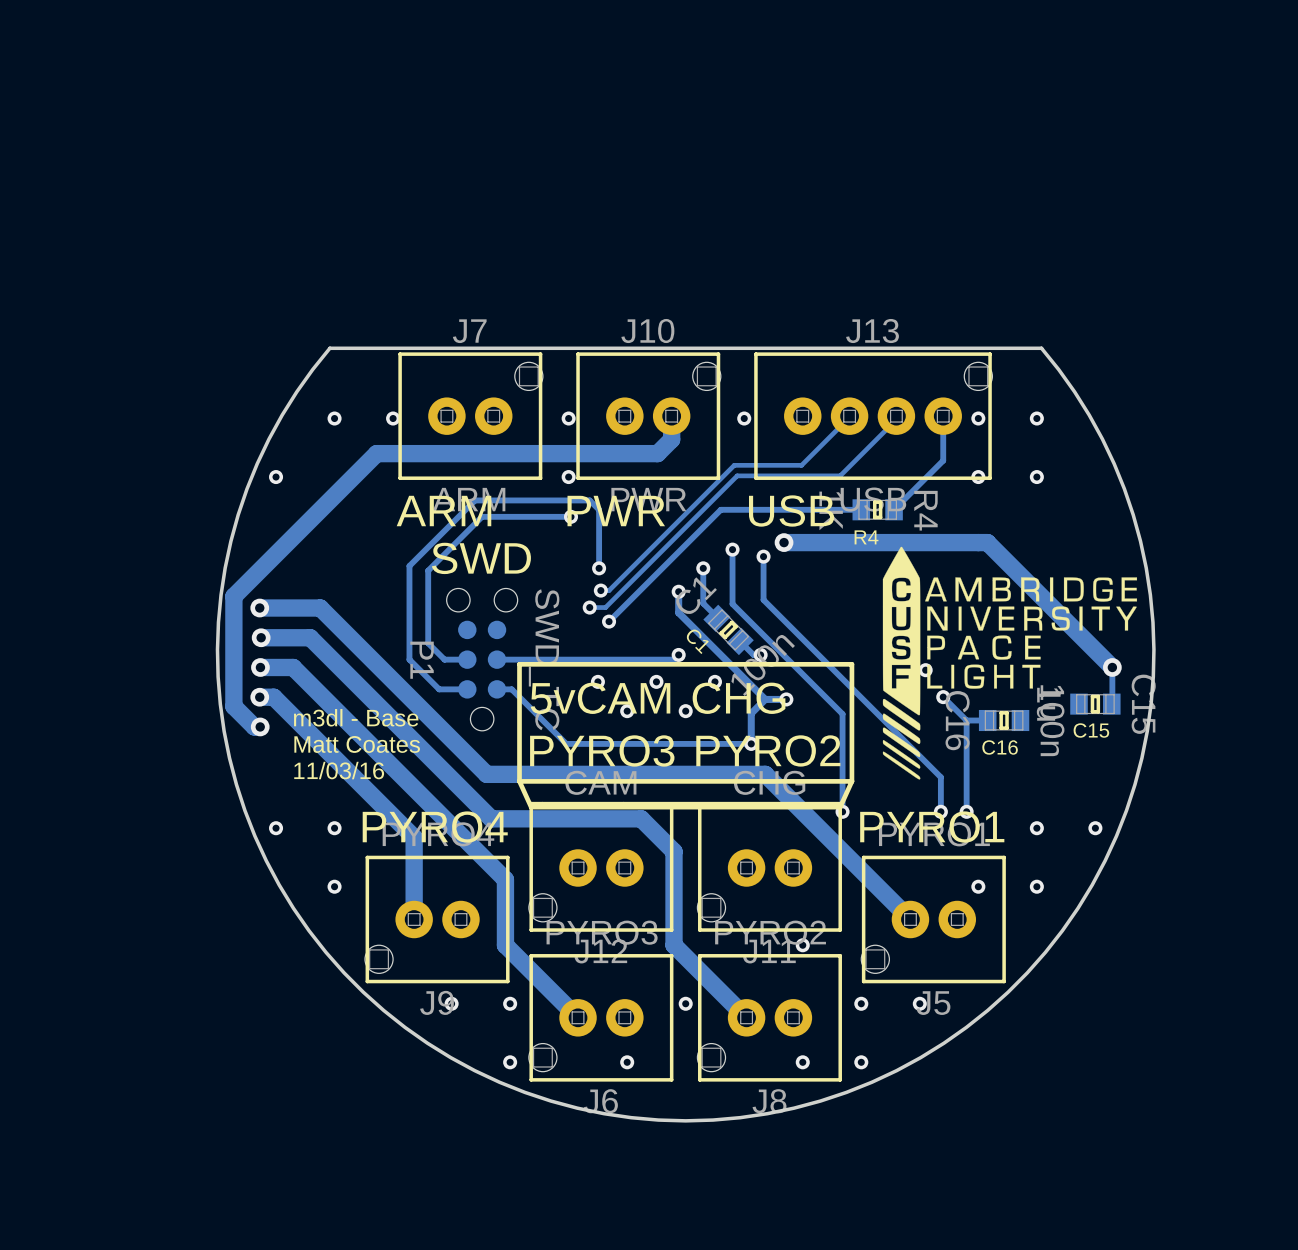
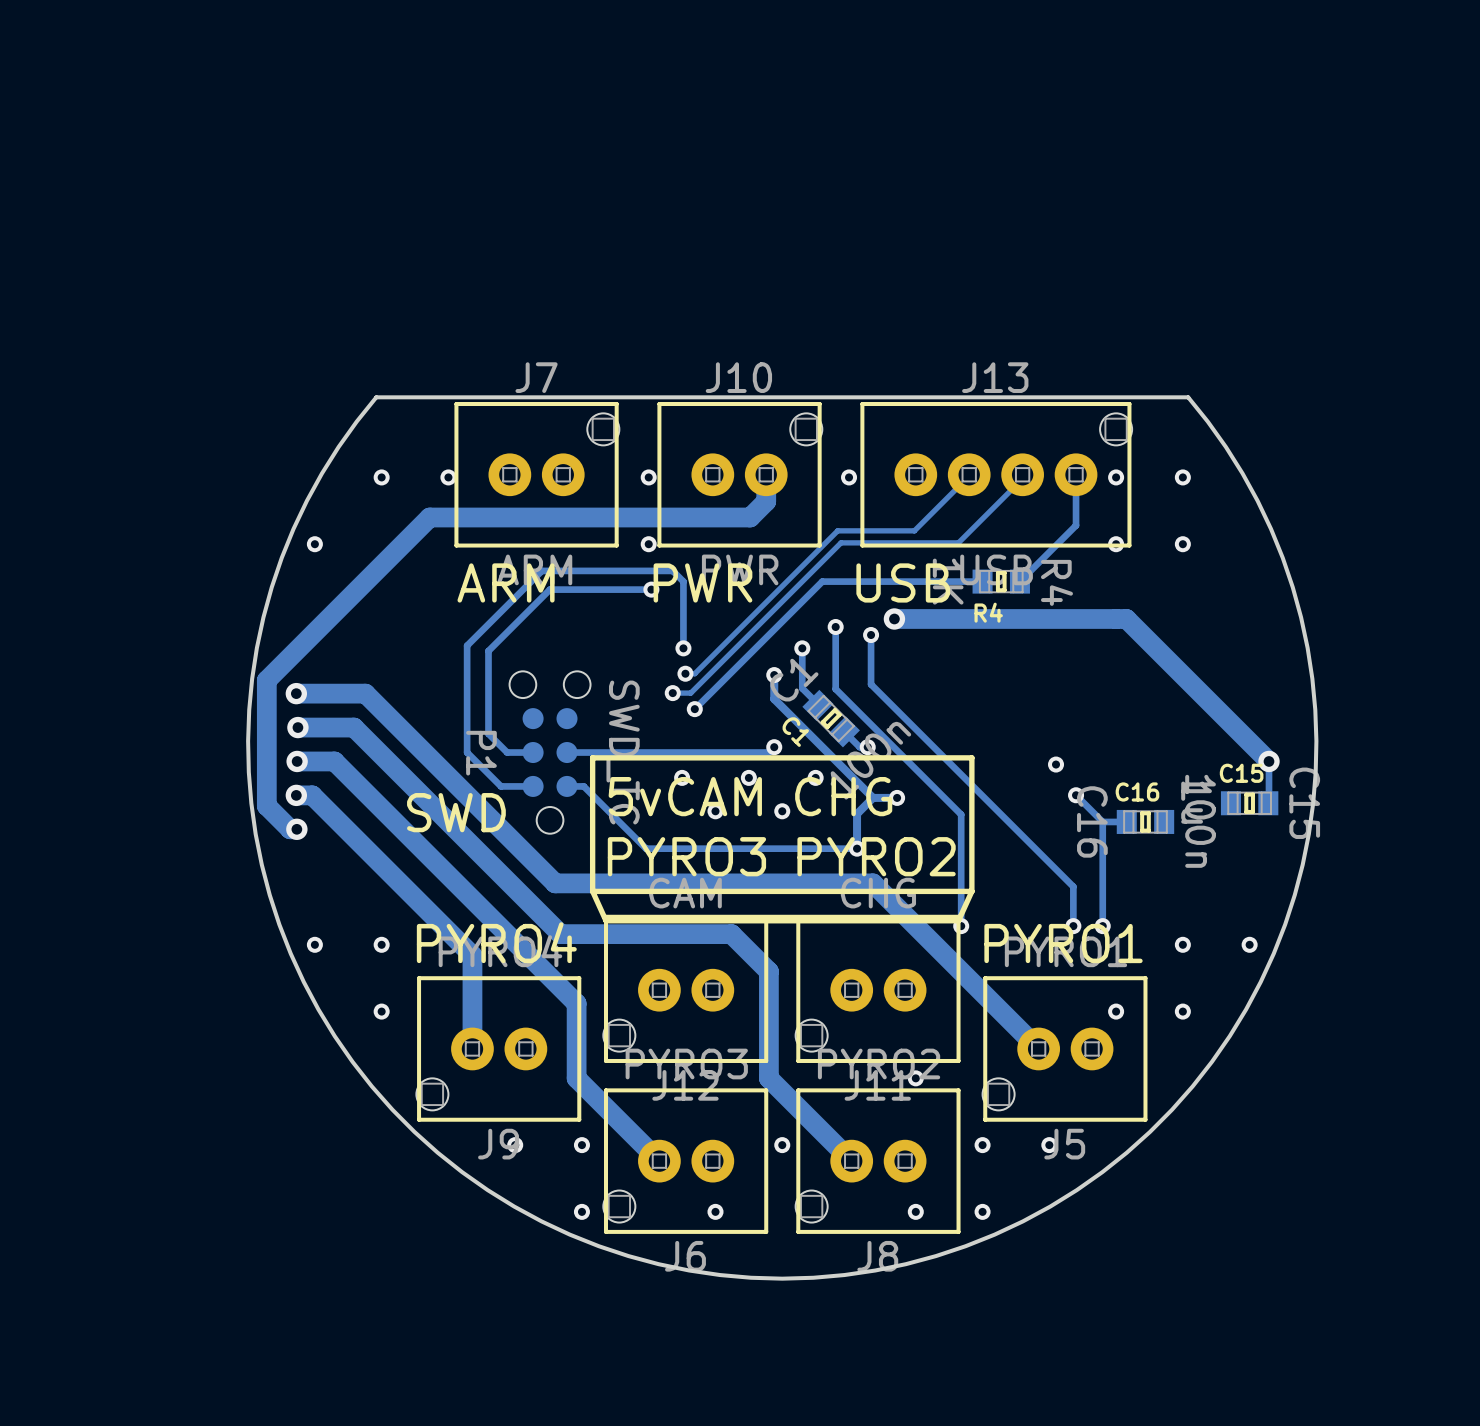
drawing: [882, 546, 1138, 780] -> none
text position: SWD (481, 558) -> SWD (456, 812)
text: m3dl - Base (356, 717) -> none
text position: C15 (1091, 730) -> C15 (1241, 773)
text: Matt Coates (357, 744) -> none
text position: C16 (1000, 747) -> C16 (1137, 791)
text: 11/03/16 (339, 770) -> none

